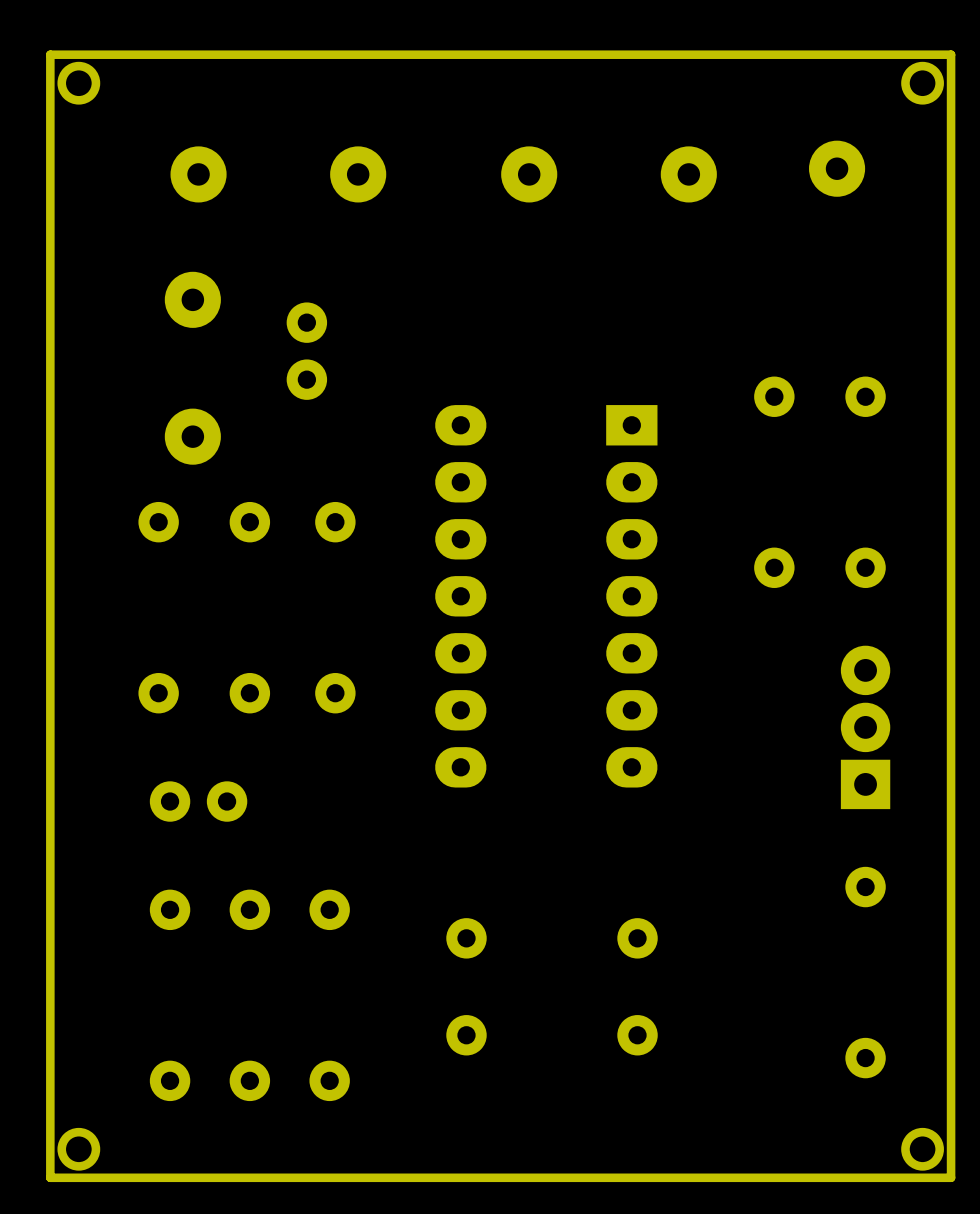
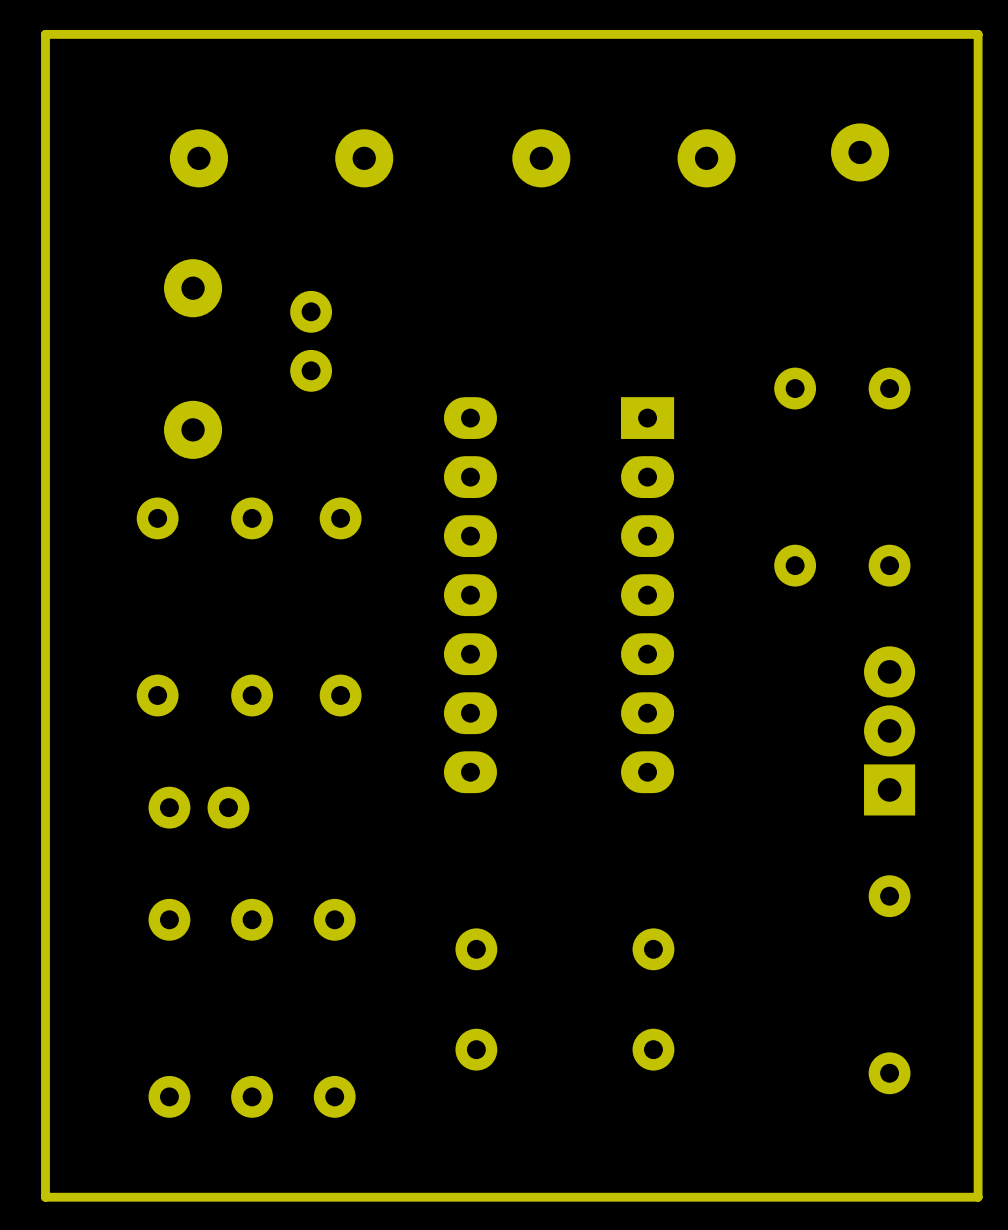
round board edge: [57, 61, 101, 105] -> none
round board edge: [901, 61, 944, 105] -> none
round board edge: [57, 1127, 101, 1171] -> none
round board edge: [901, 1127, 944, 1171] -> none

